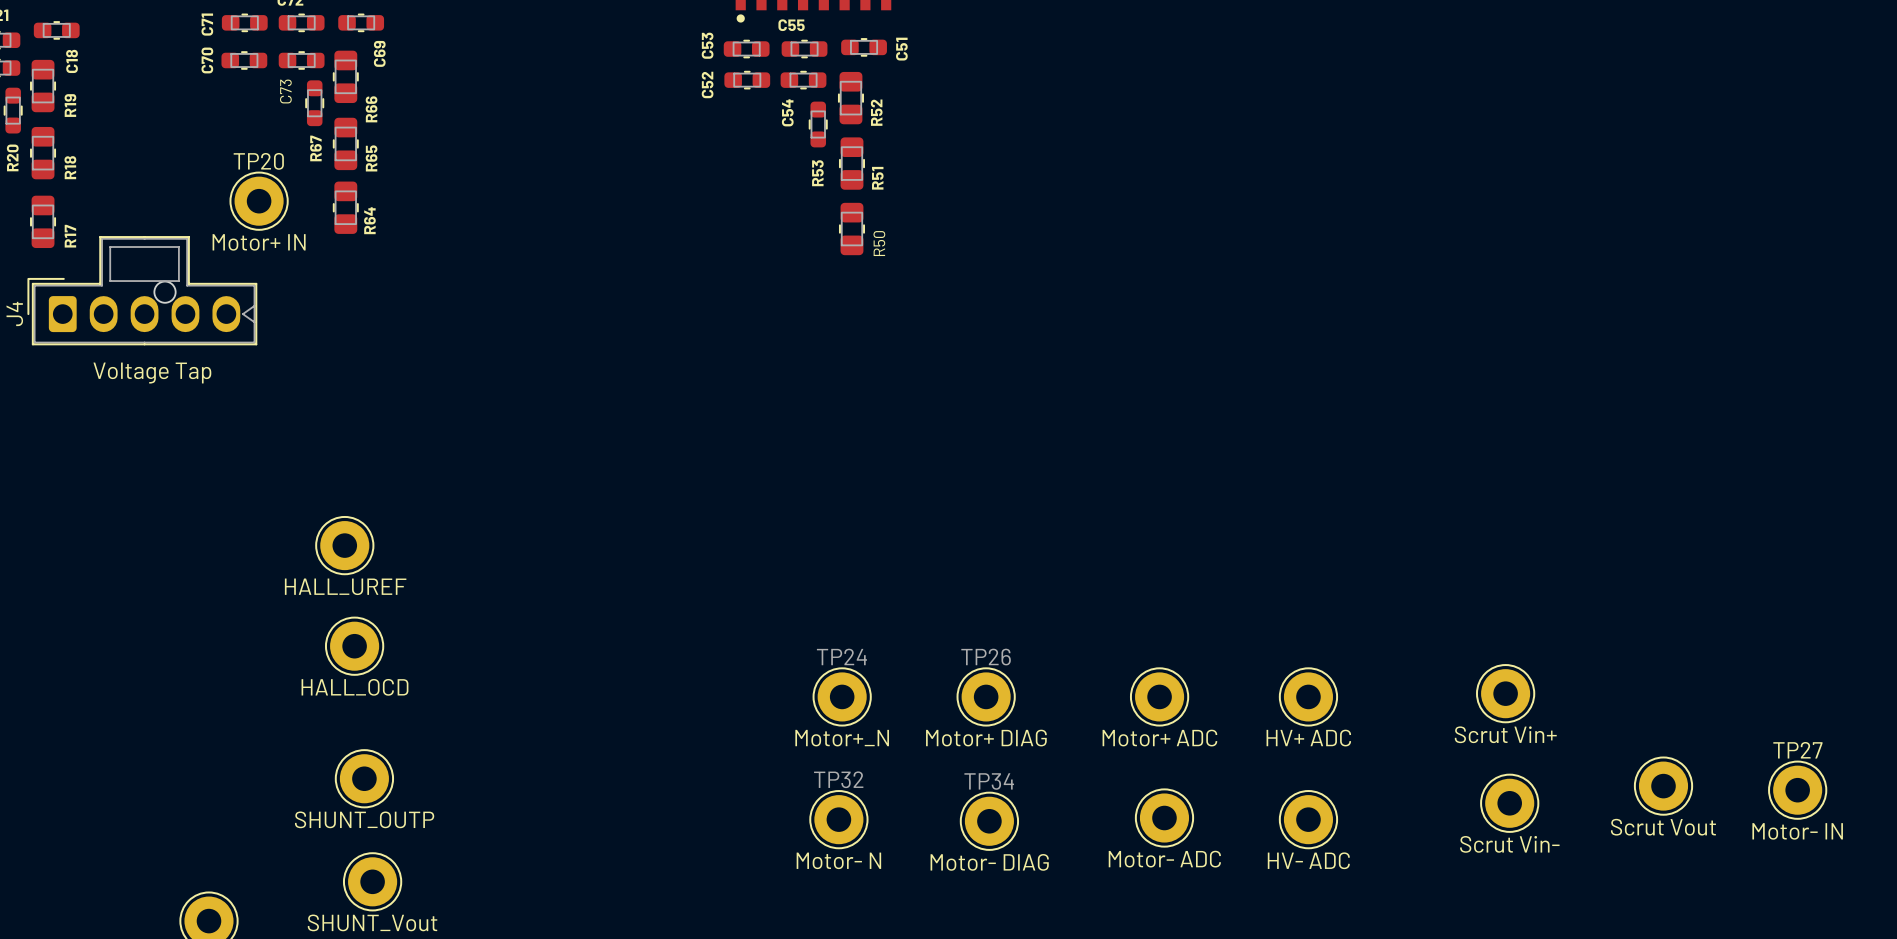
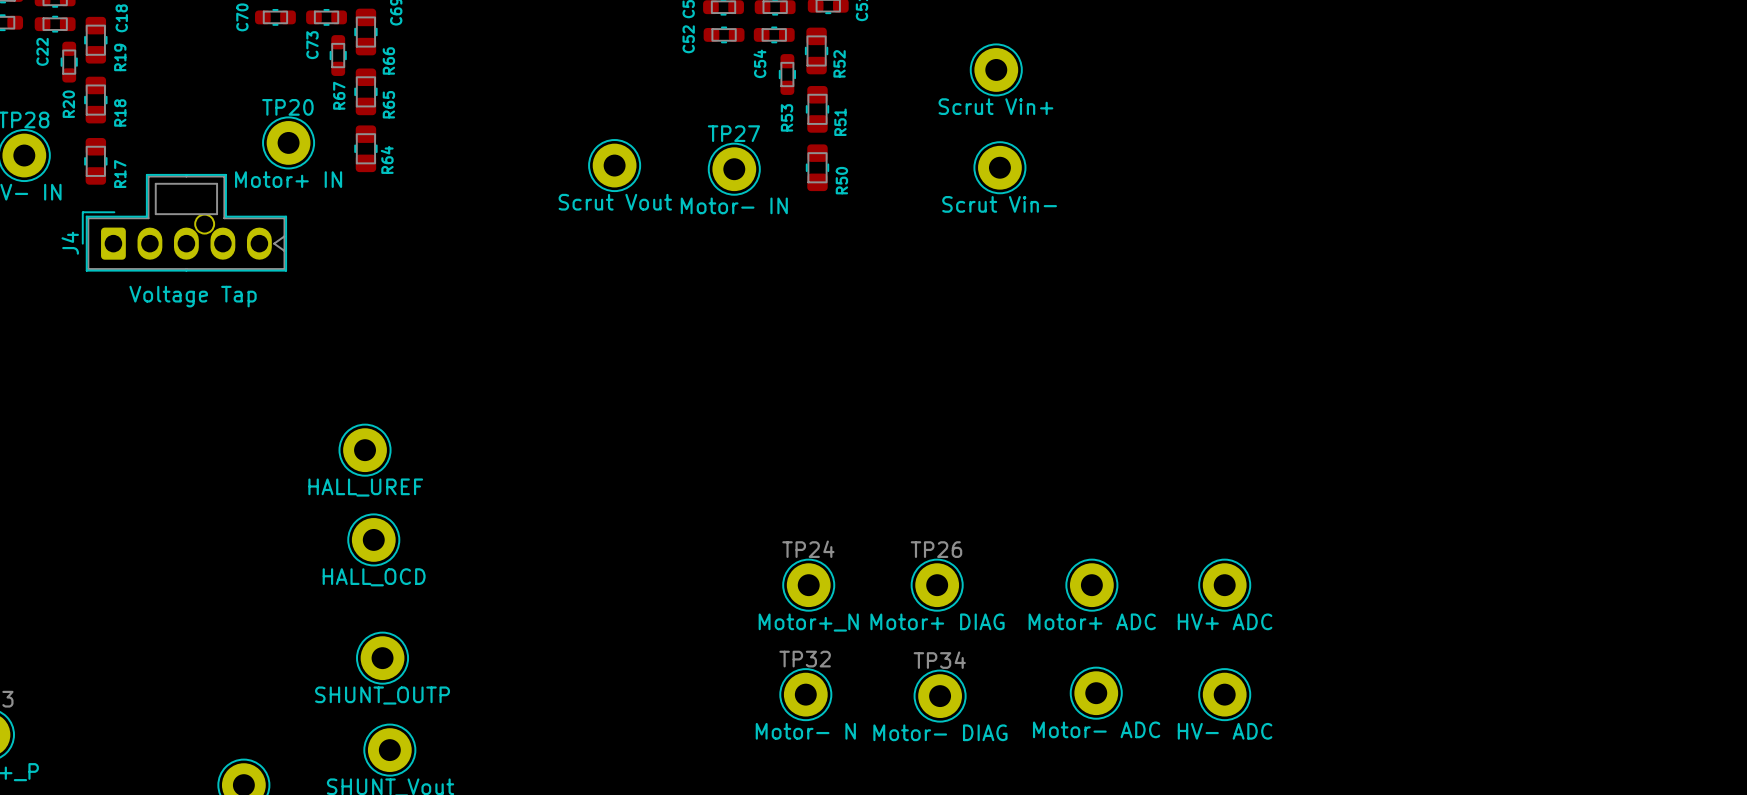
part: none -> Scrut Vin+ (996, 69)
part: none -> Scrut Vout (614, 165)
part: none -> Scrut Vin- (999, 167)
part: Scrut Vin+ (1505, 693) -> none
part: Scrut Vout (1663, 786) -> none
TP27 position: (1797, 790) -> (734, 169)
part: Scrut Vin- (1509, 803) -> none

